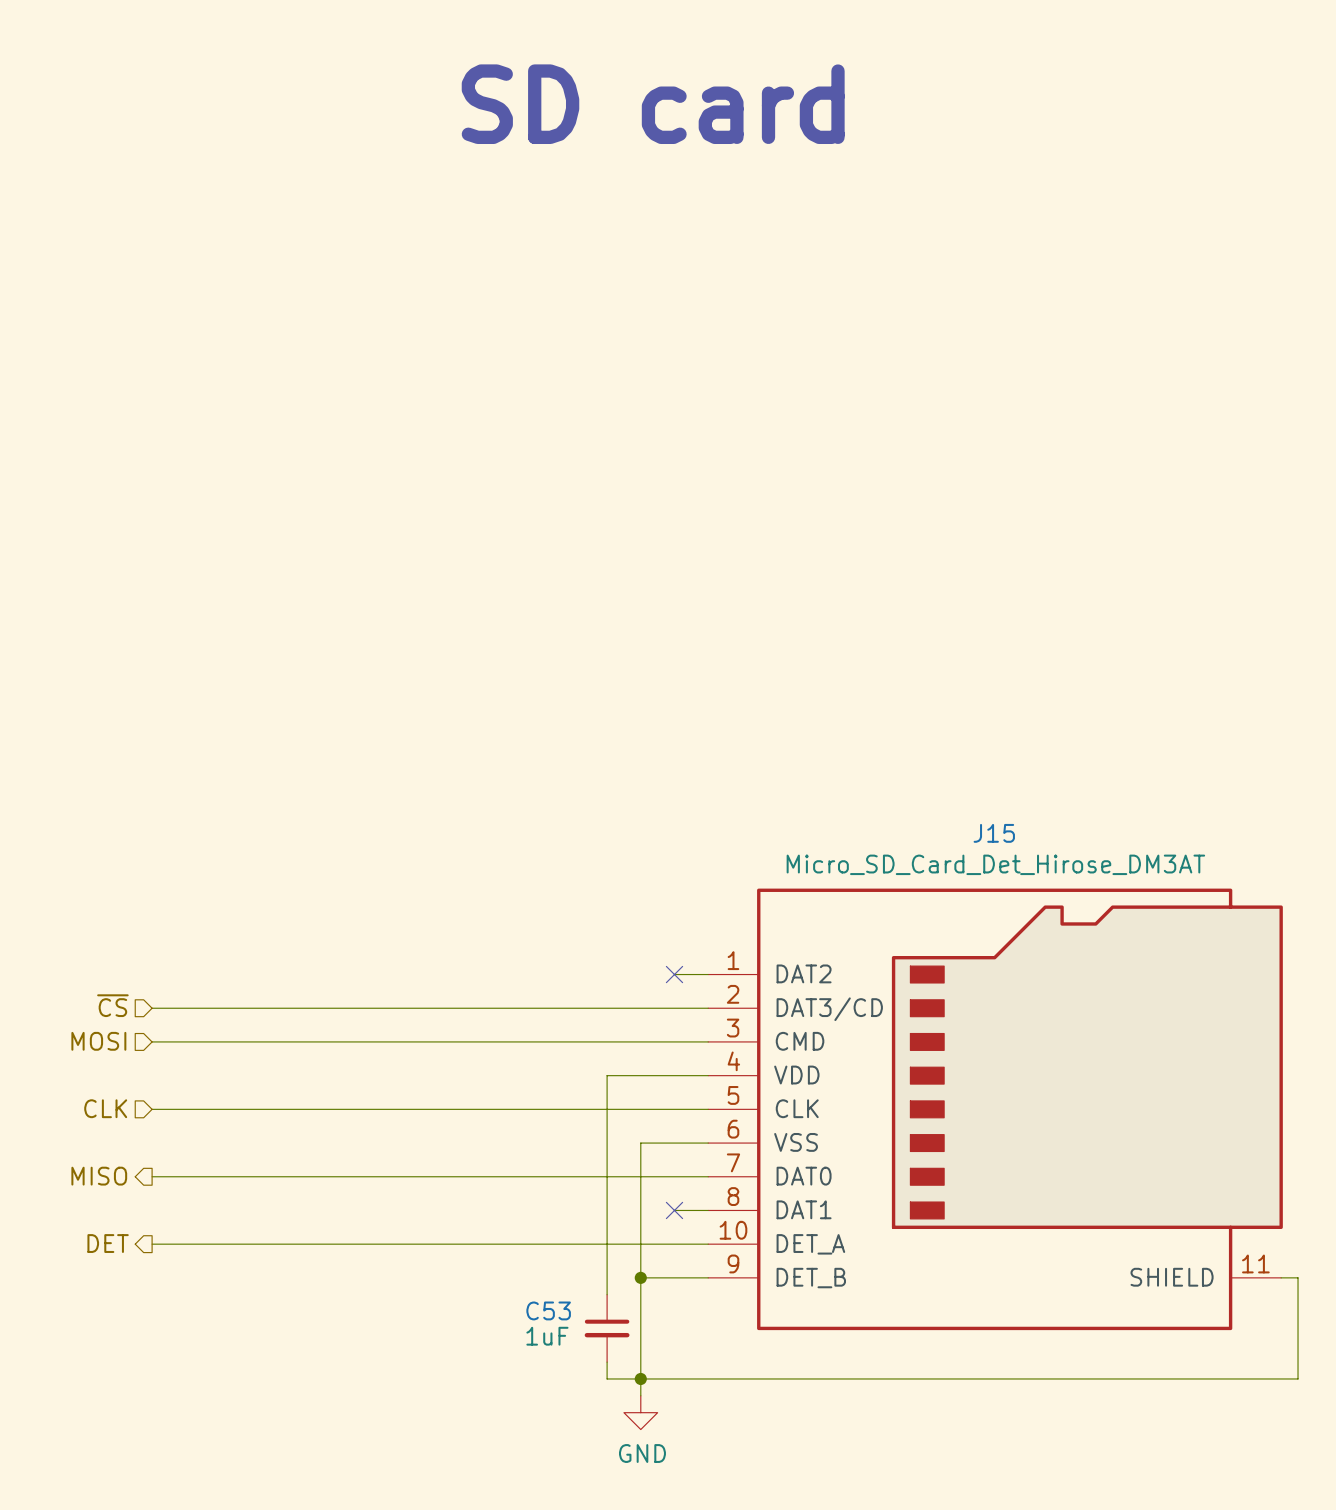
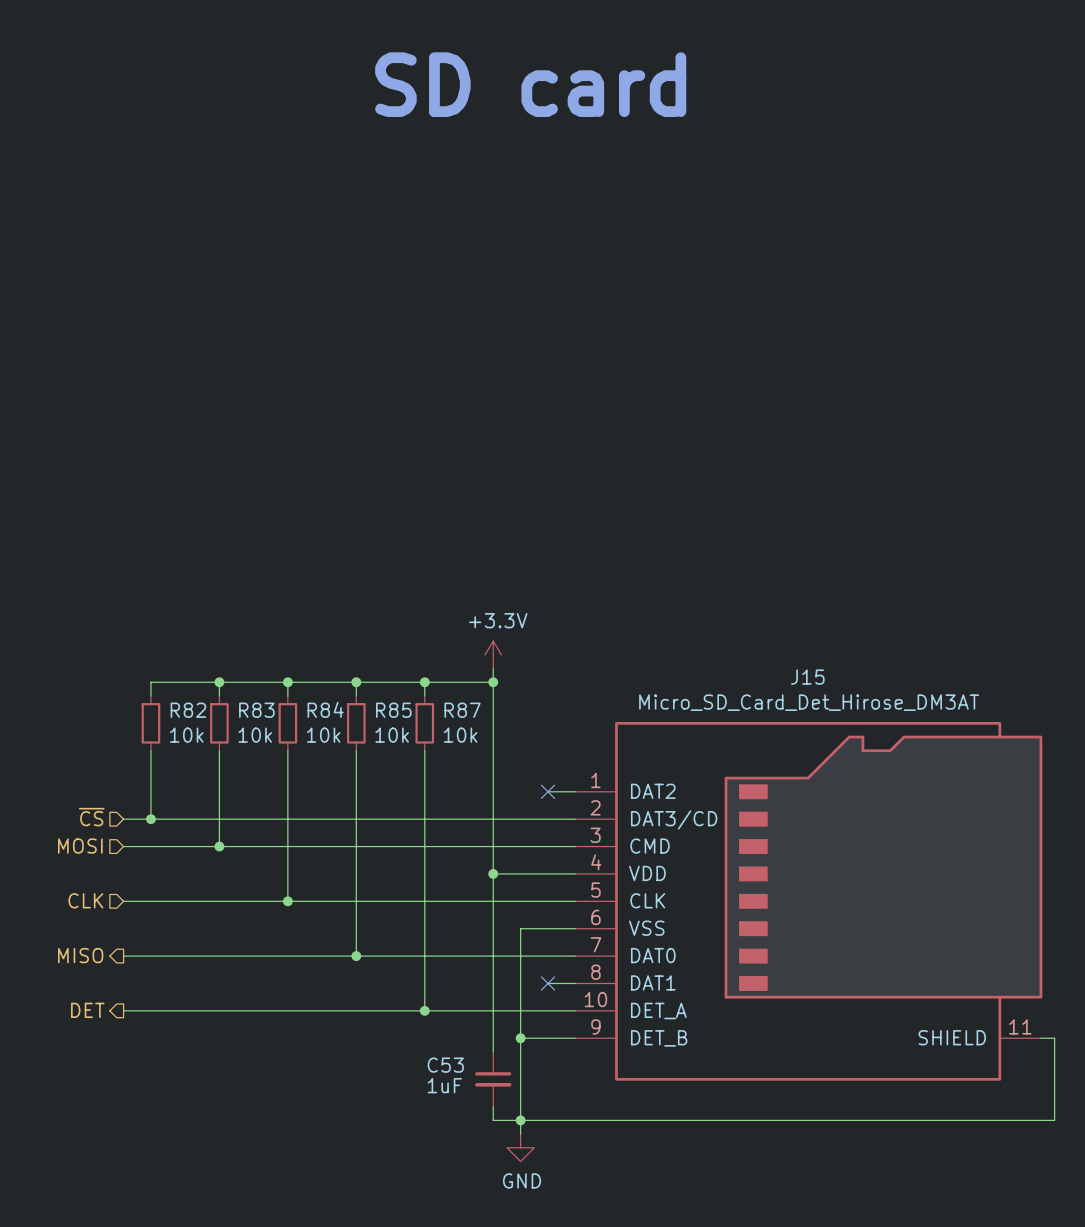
power symbol: none -> +3.3V (493, 654)
wire: none -> (493, 668) (493, 873)
wire: none -> (219, 682) (219, 695)
junction: none -> (219, 682)
wire: none -> (287, 682) (287, 695)
junction: none -> (287, 682)
wire: none -> (356, 682) (356, 695)
junction: none -> (356, 682)
wire: none -> (424, 682) (424, 695)
junction: none -> (424, 682)
wire: none -> (493, 682) (150, 682) (150, 695)
junction: none -> (493, 682)
R82: none -> 10k (150, 723)
R83: none -> 10k (219, 723)
R84: none -> 10k (287, 723)
R85: none -> 10k (356, 723)
R87: none -> 10k (424, 723)
wire: none -> (150, 750) (150, 819)
wire: none -> (219, 750) (219, 846)
wire: none -> (287, 750) (287, 901)
wire: none -> (356, 750) (356, 956)
wire: none -> (424, 750) (424, 1010)
junction: none -> (150, 819)
junction: none -> (219, 846)
junction: none -> (493, 873)
junction: none -> (287, 901)
junction: none -> (356, 956)
junction: none -> (424, 1010)

